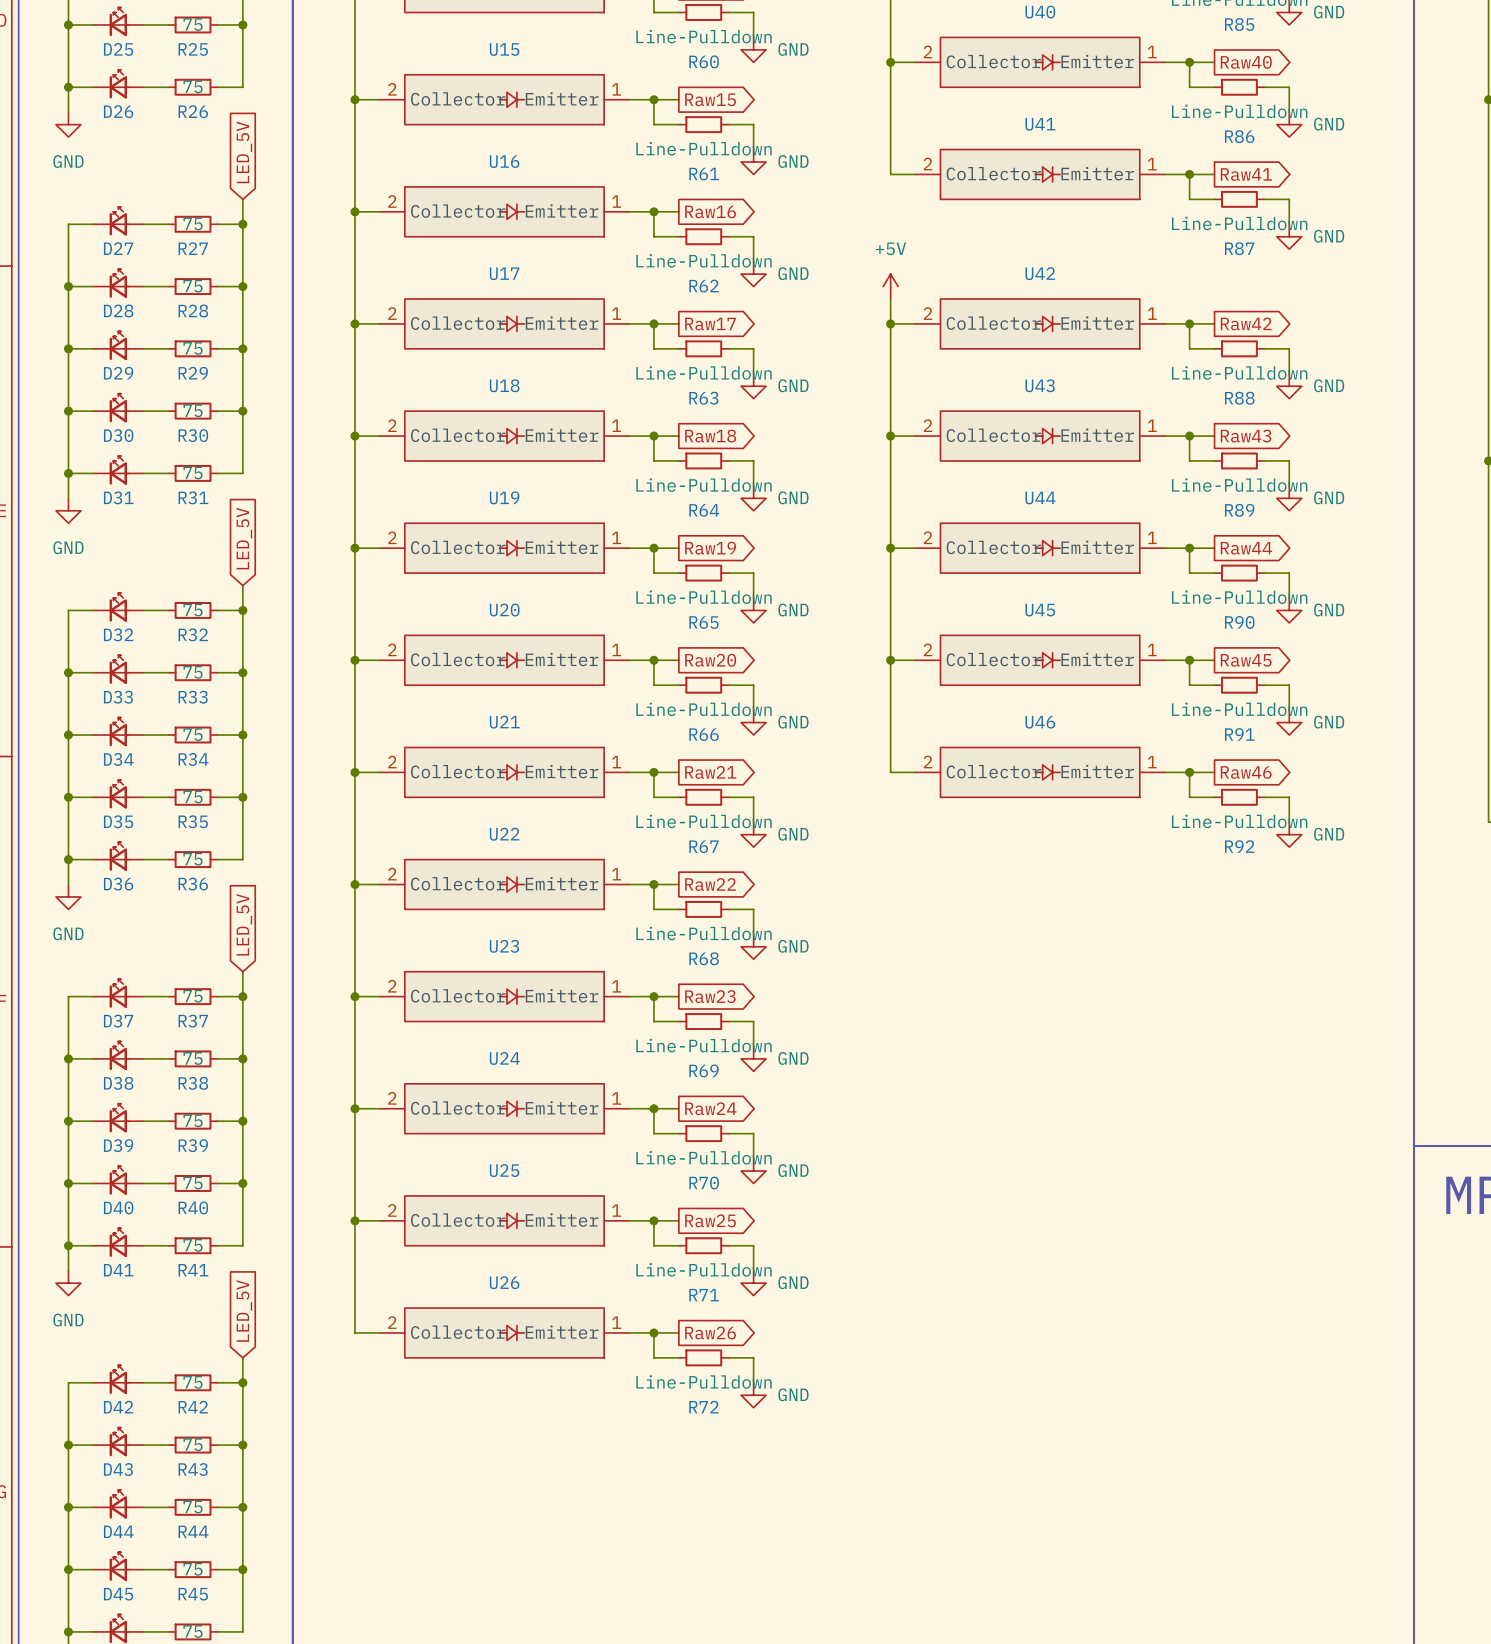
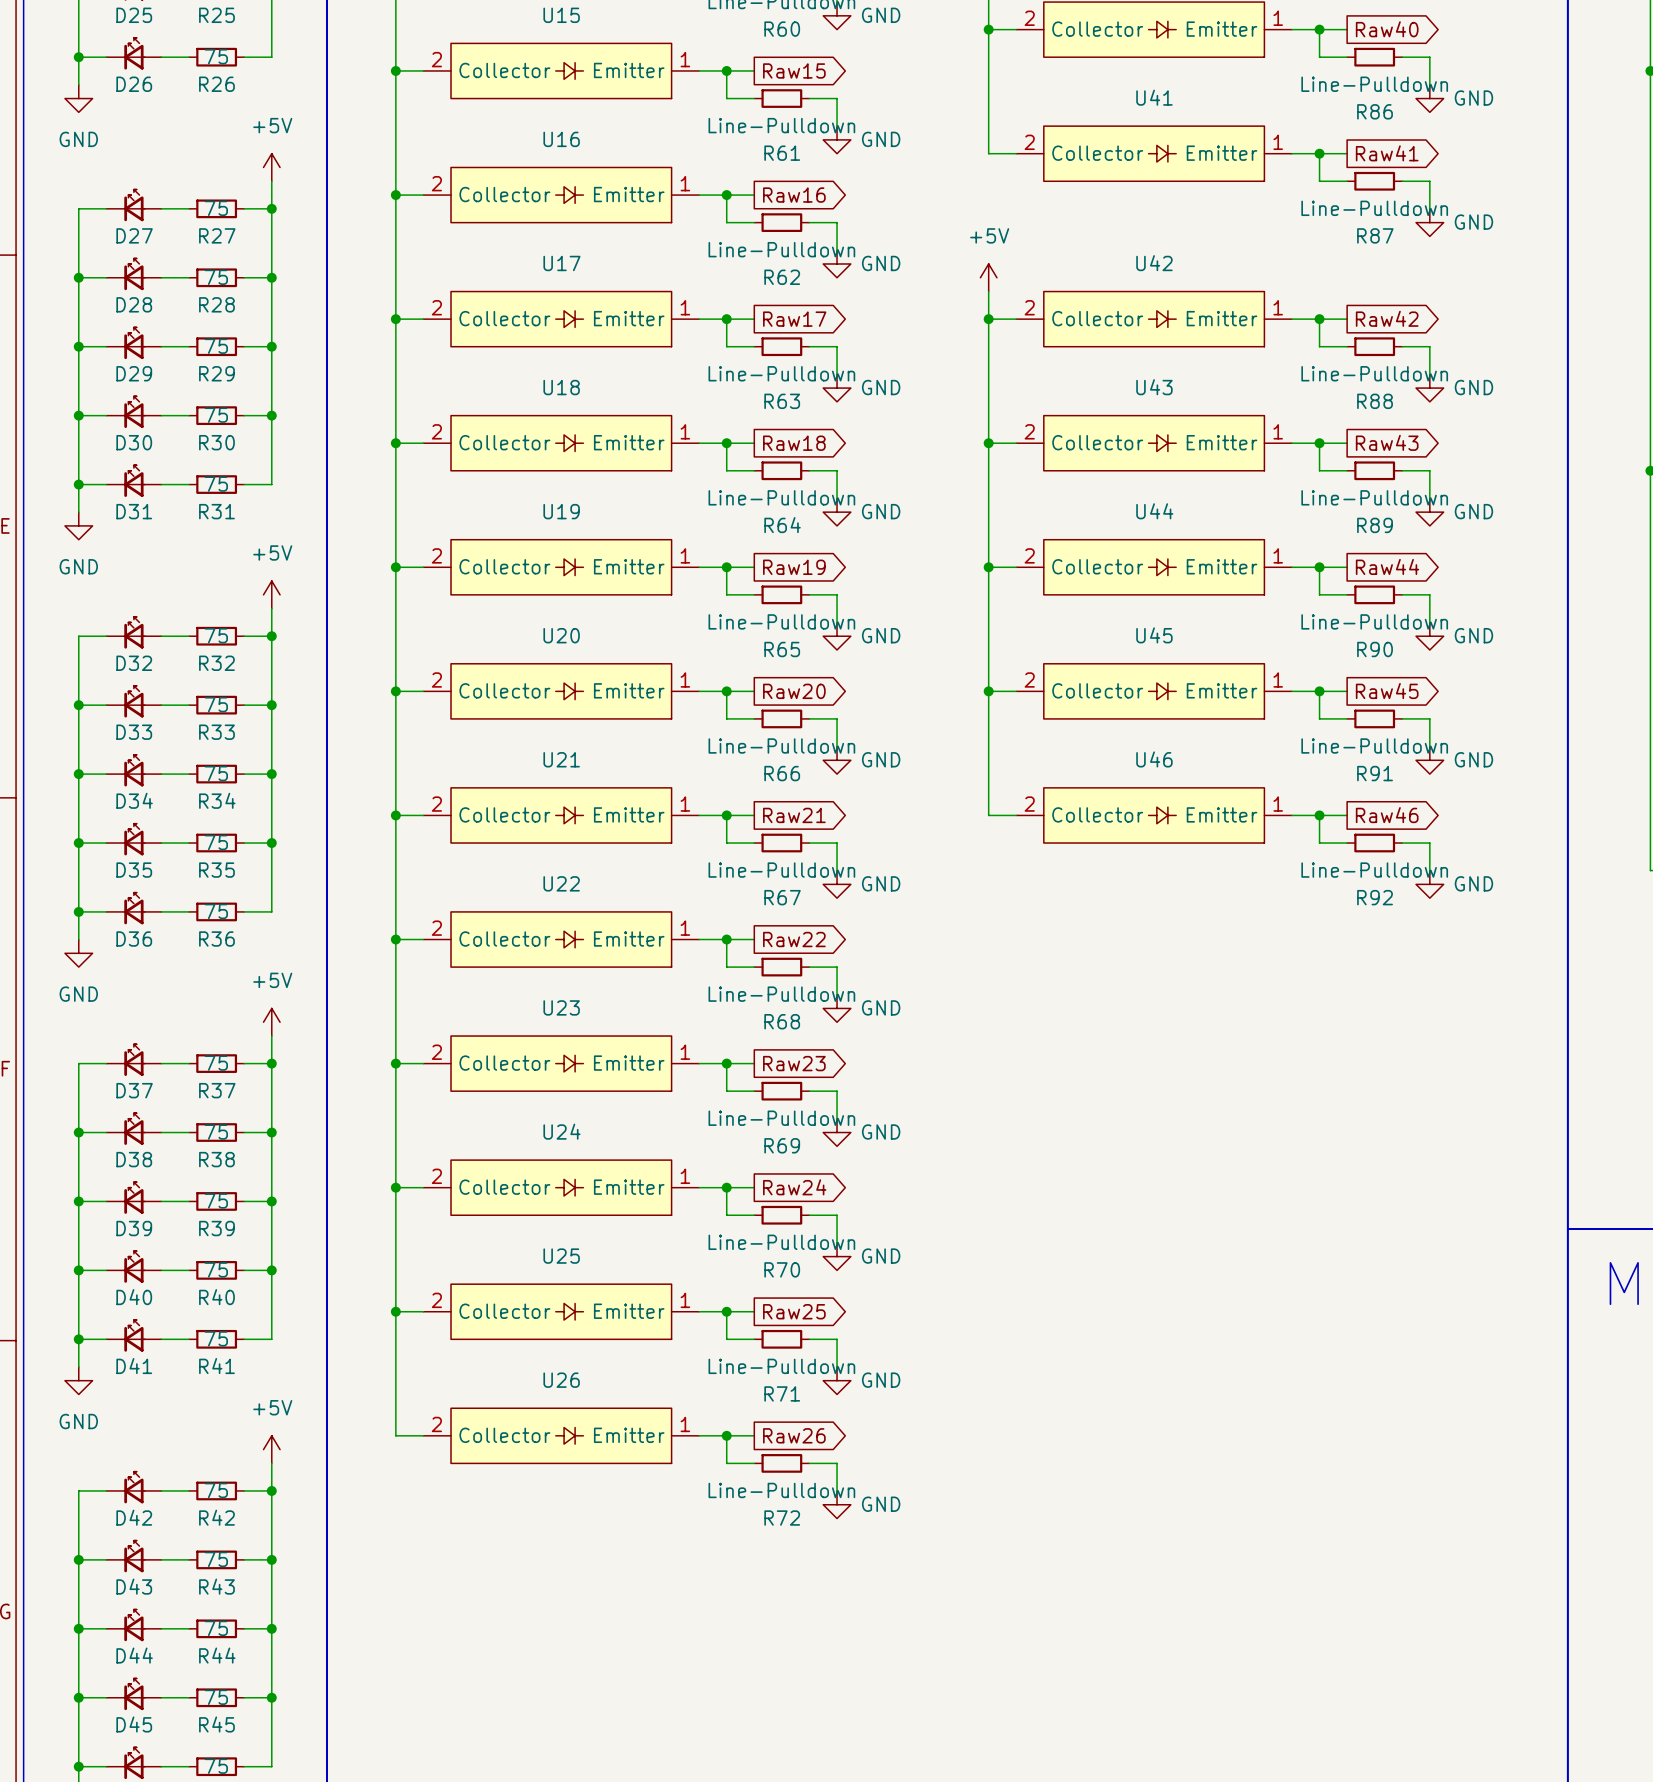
global label: LED_5V (244, 152) -> none
power symbol: none -> +5V (271, 167)
global label: LED_5V (244, 538) -> none
power symbol: none -> +5V (271, 594)
global label: LED_5V (244, 924) -> none
power symbol: none -> +5V (271, 1022)
global label: LED_5V (244, 1310) -> none
power symbol: none -> +5V (271, 1449)

